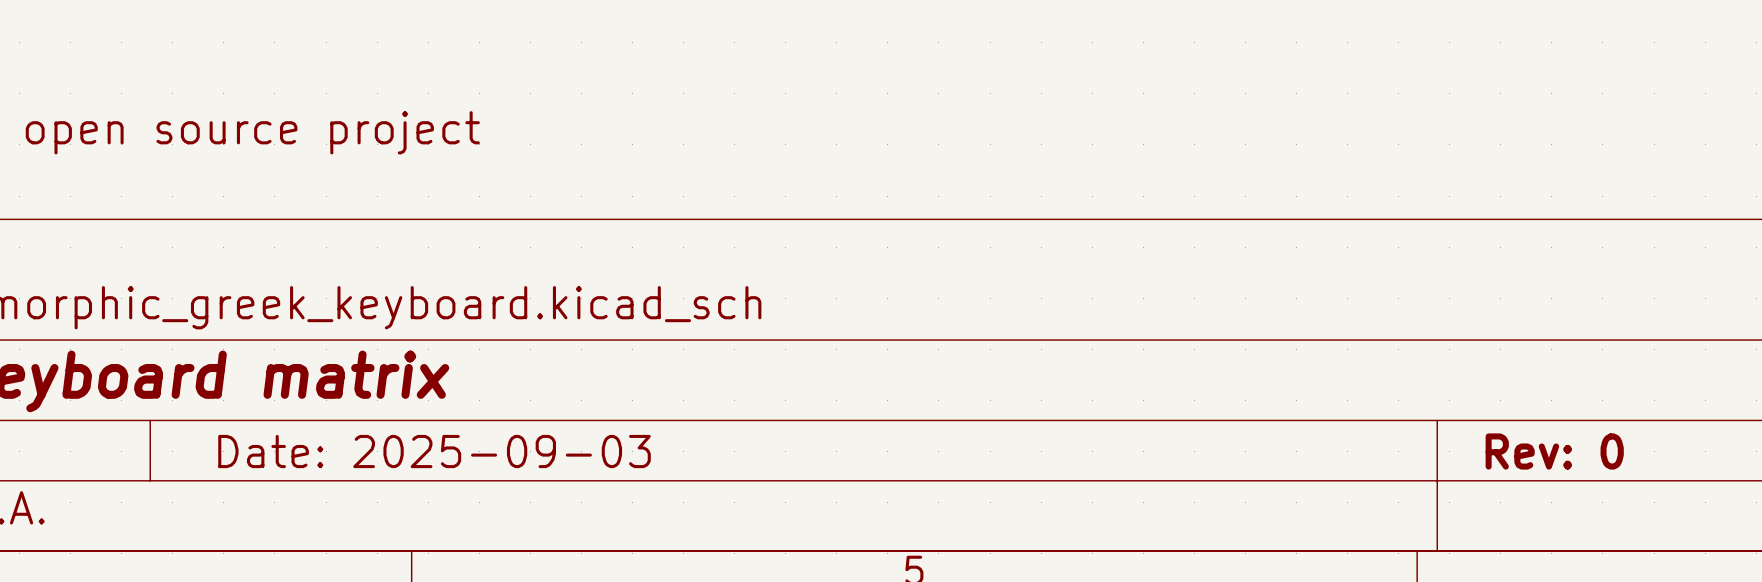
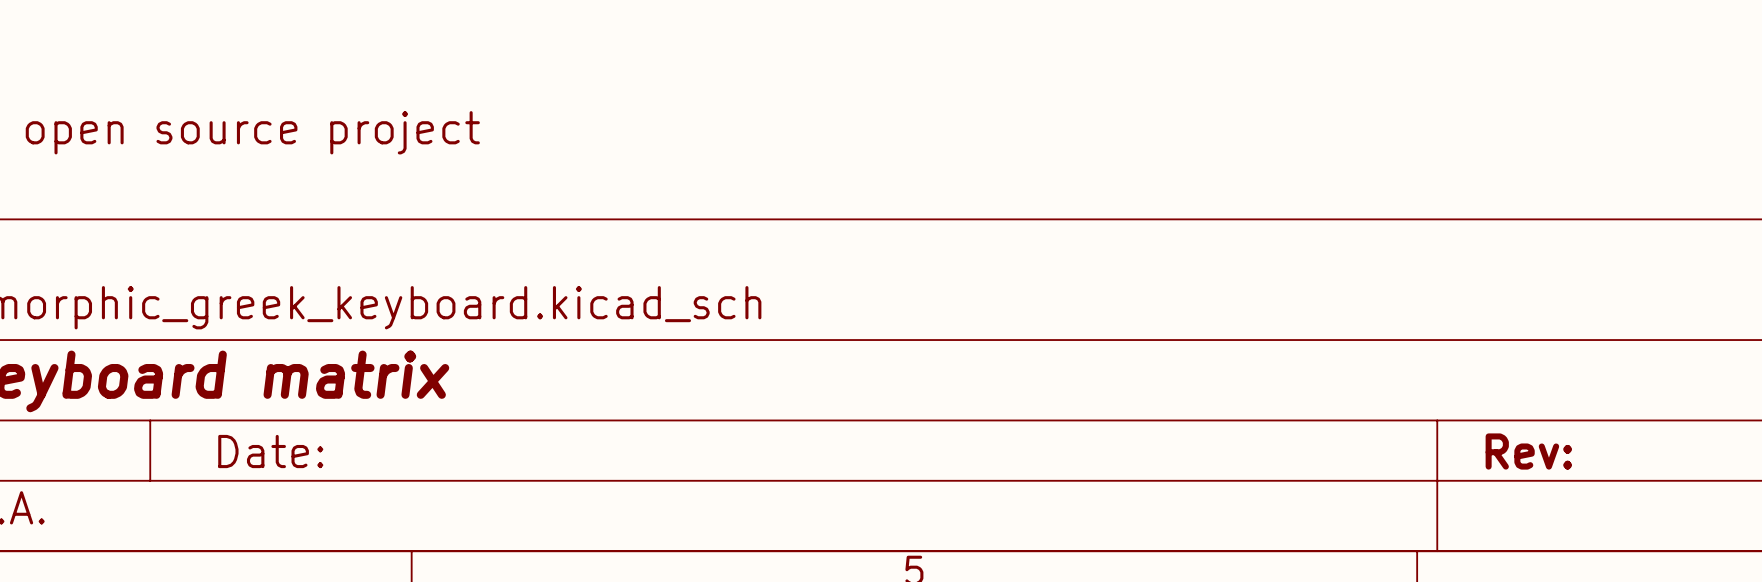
title block: Date: 2025-09-03 (434, 451) -> Date: (270, 451)
title block: Rev: 0 (1554, 451) -> Rev: (1528, 451)

